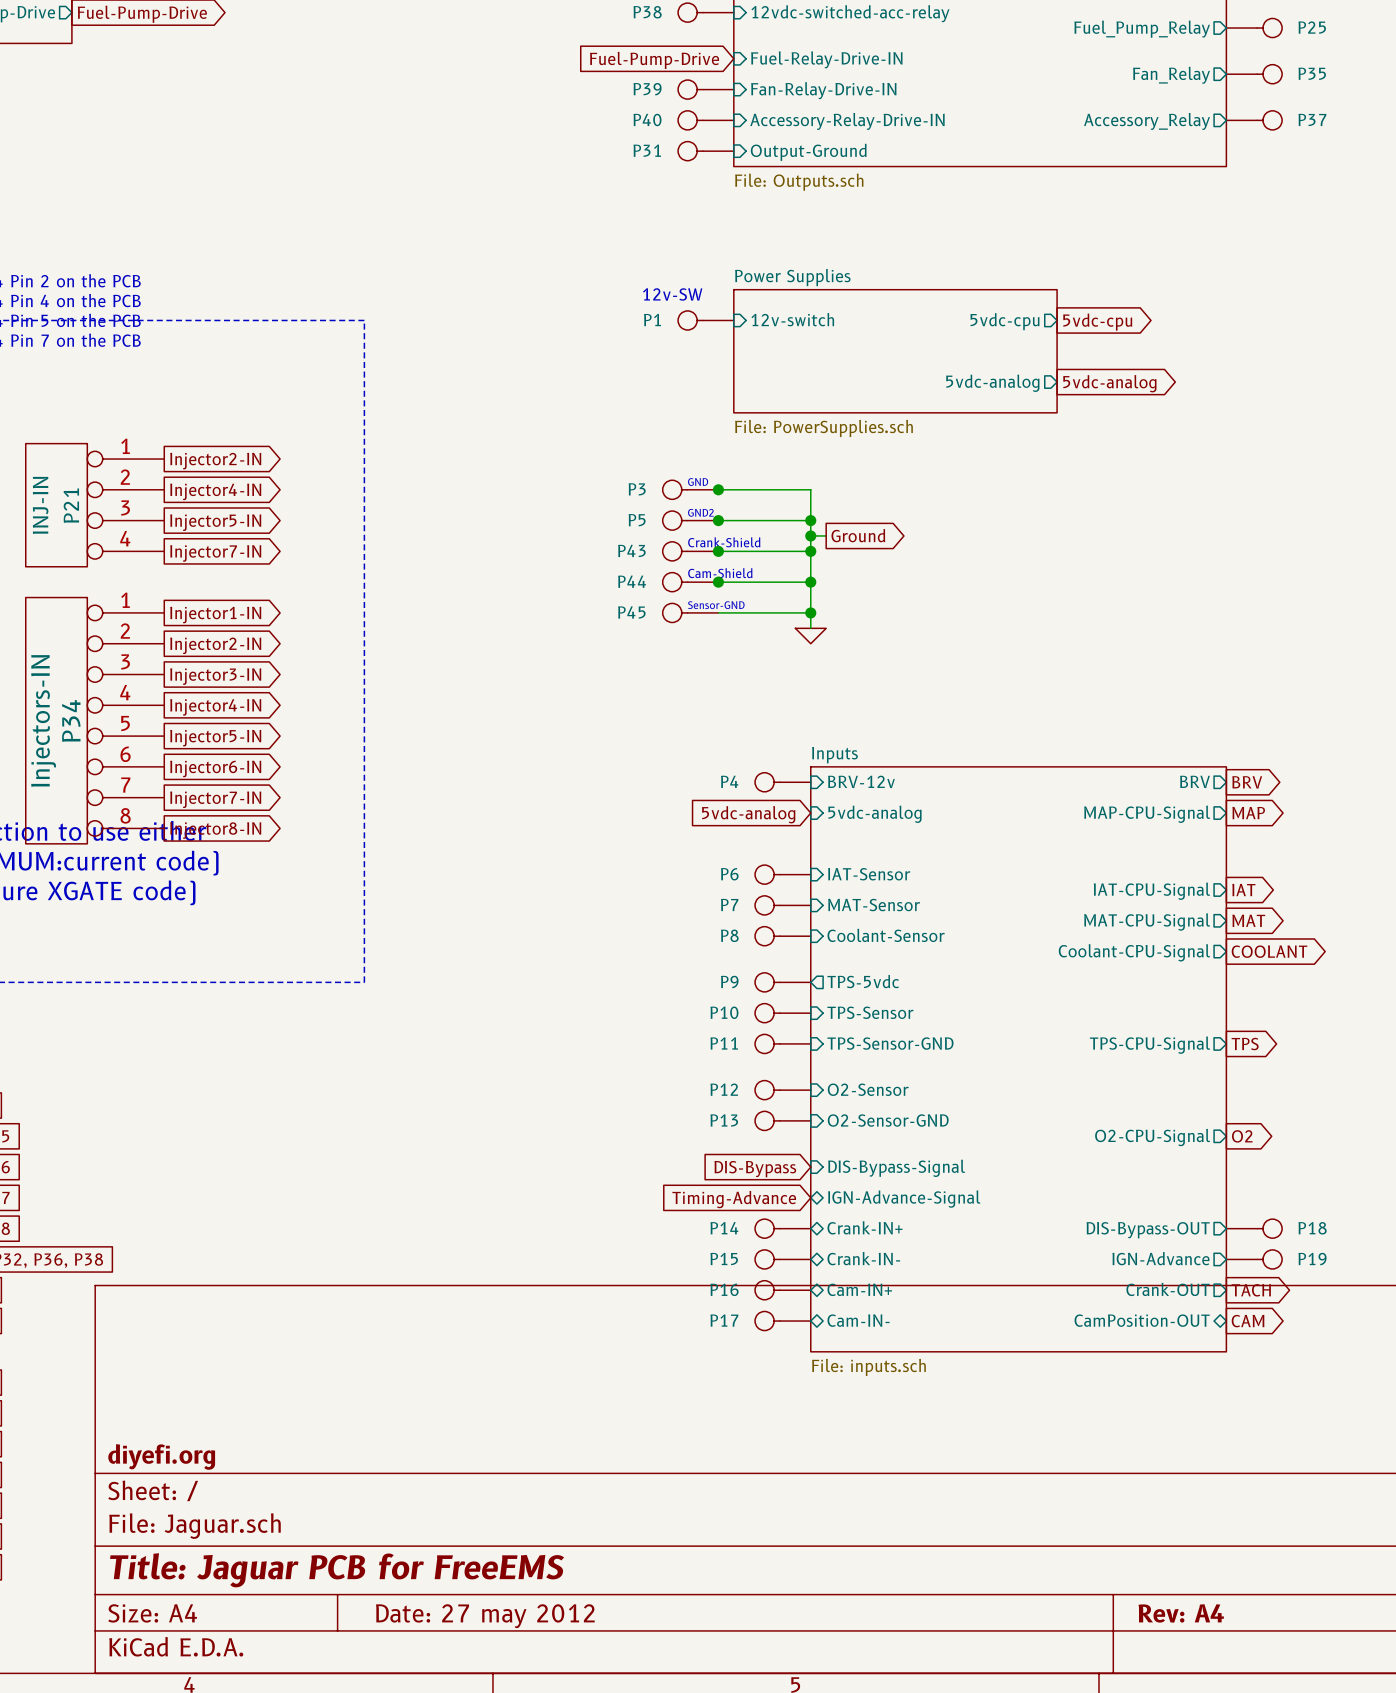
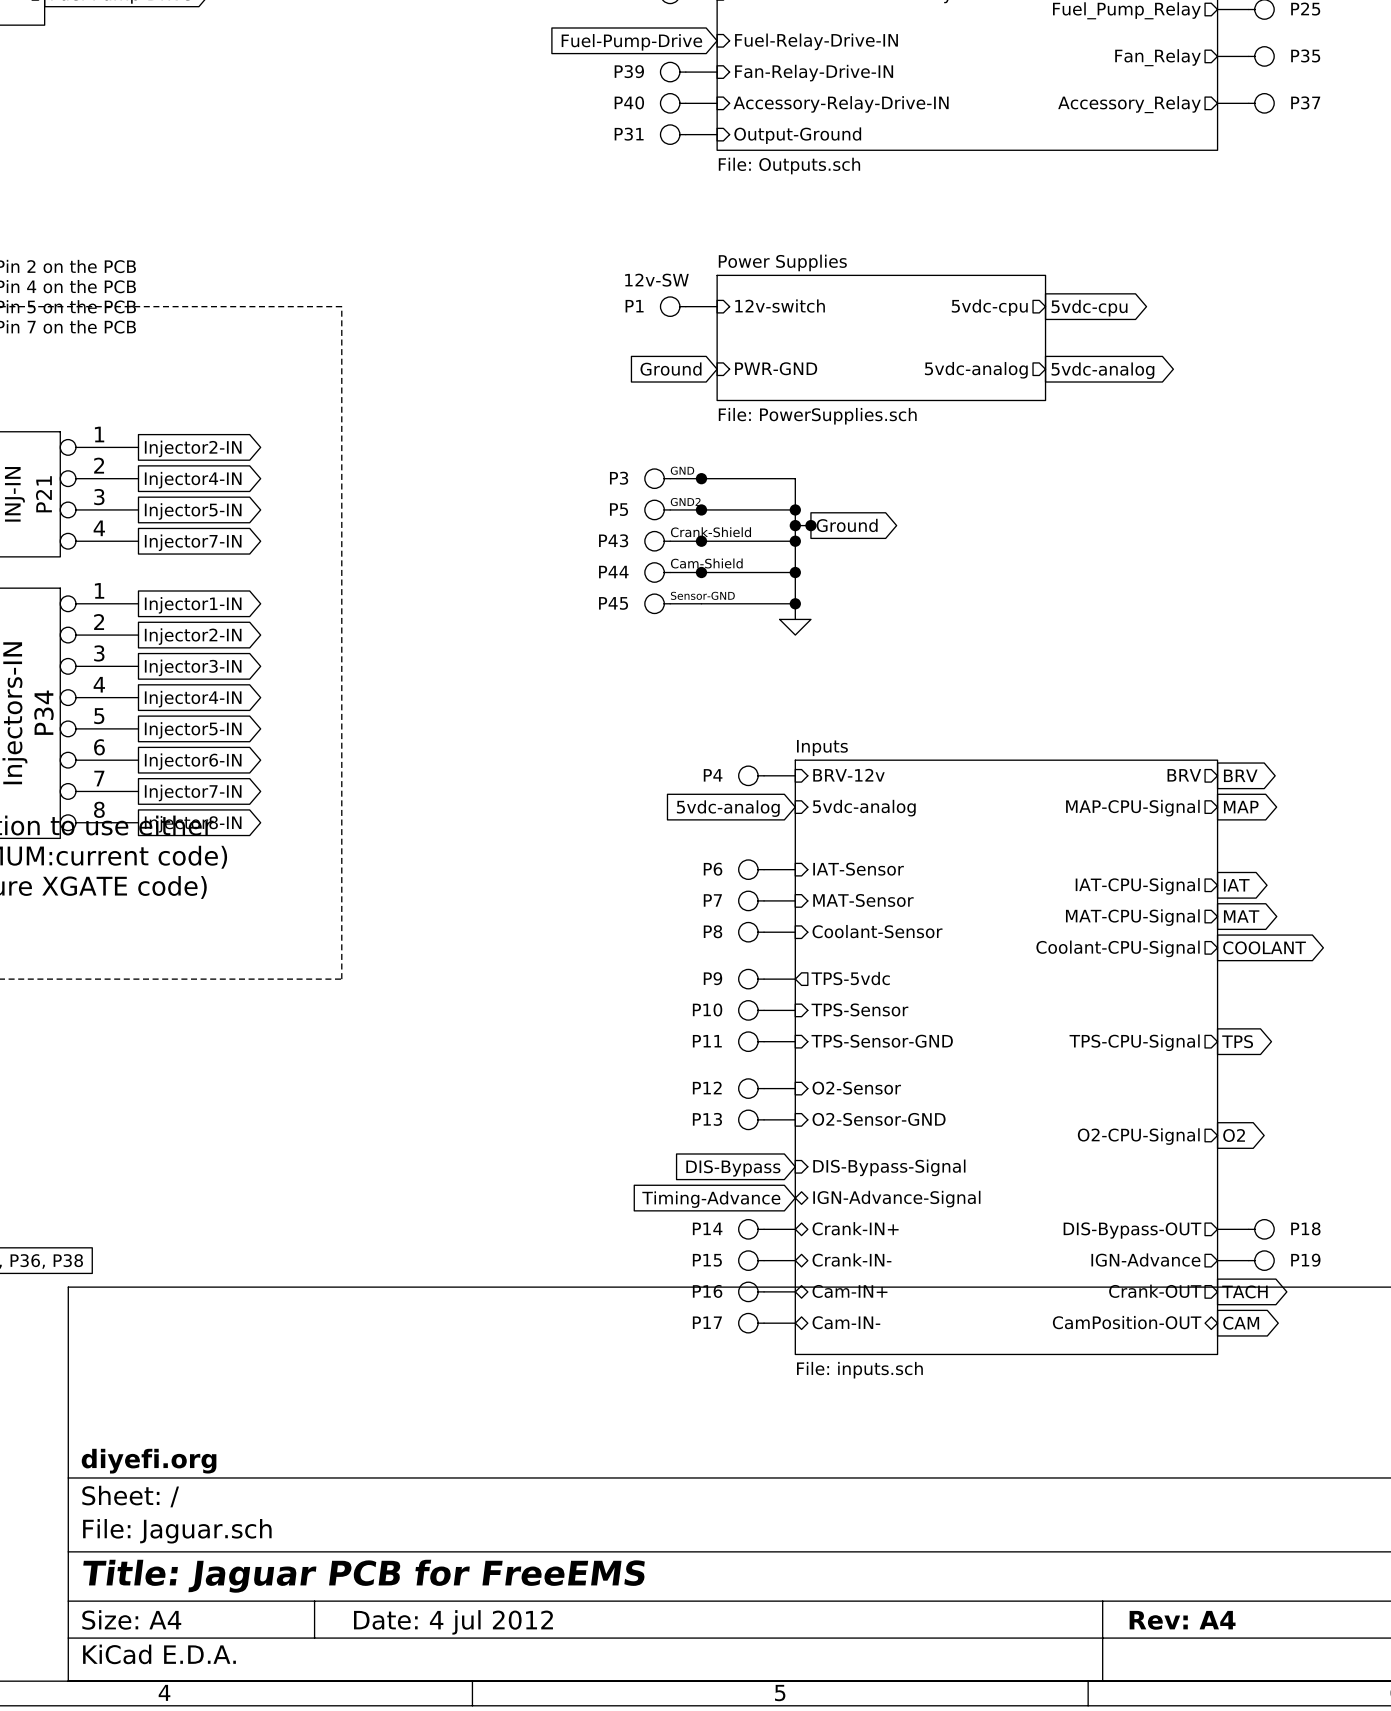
global label: none -> Ground (671, 369)
sheet pin: none -> PWR-GND (776, 368)
junction: none -> (810, 525)
title block: Date: 27 may 2012 (485, 1616) -> Date: 4 jul 2012 (453, 1622)

